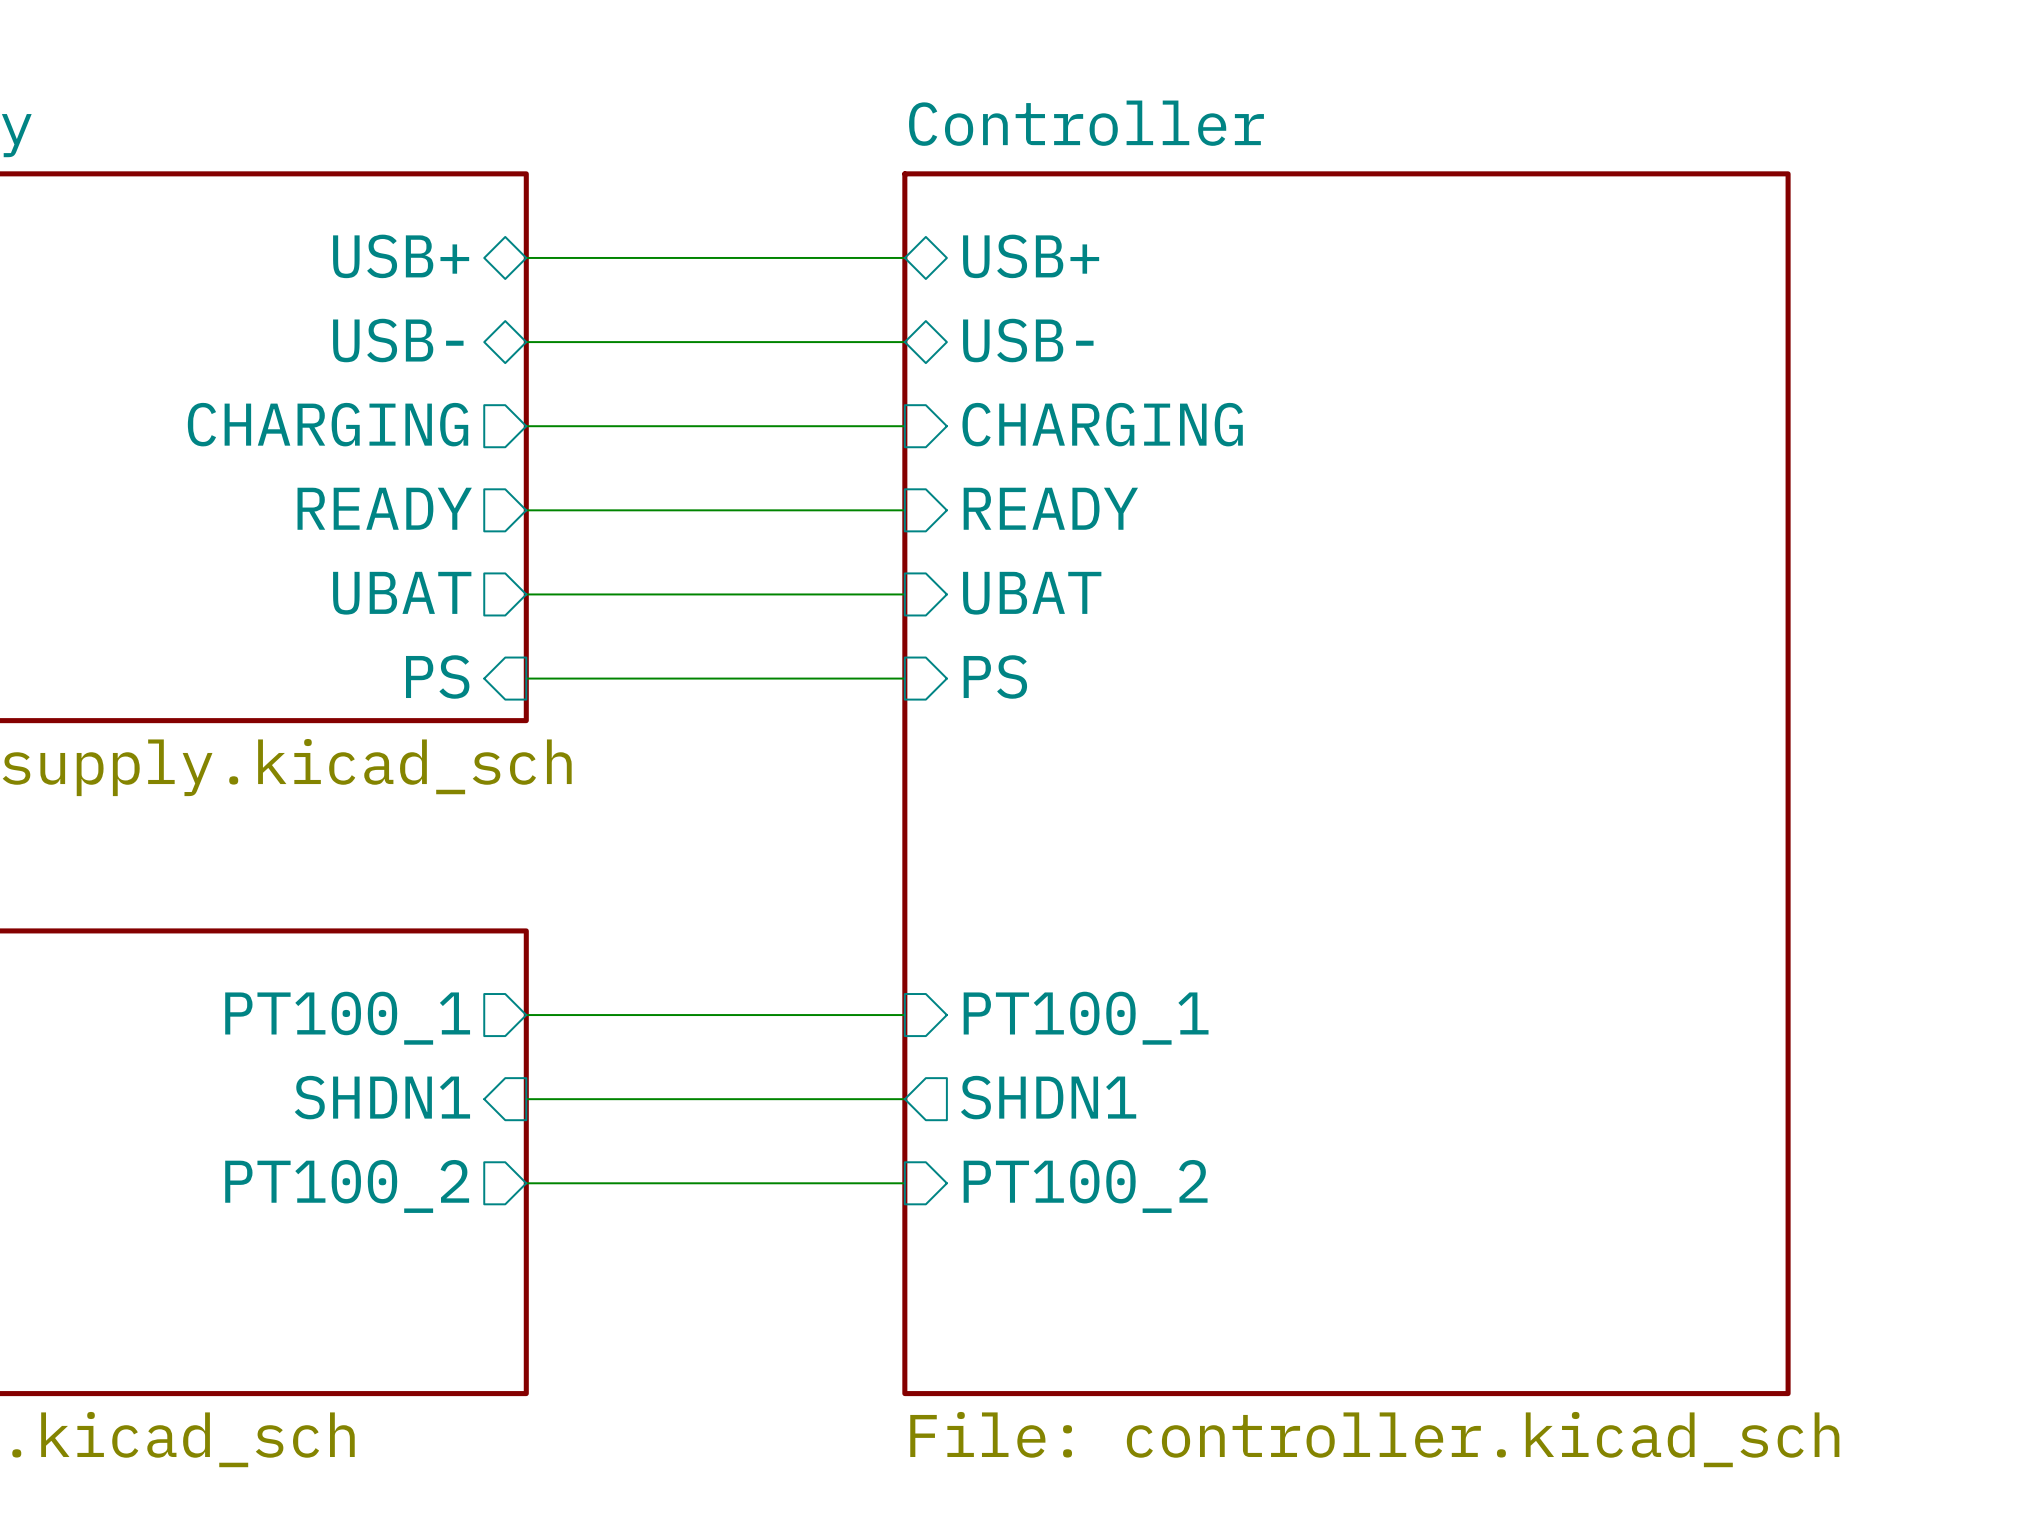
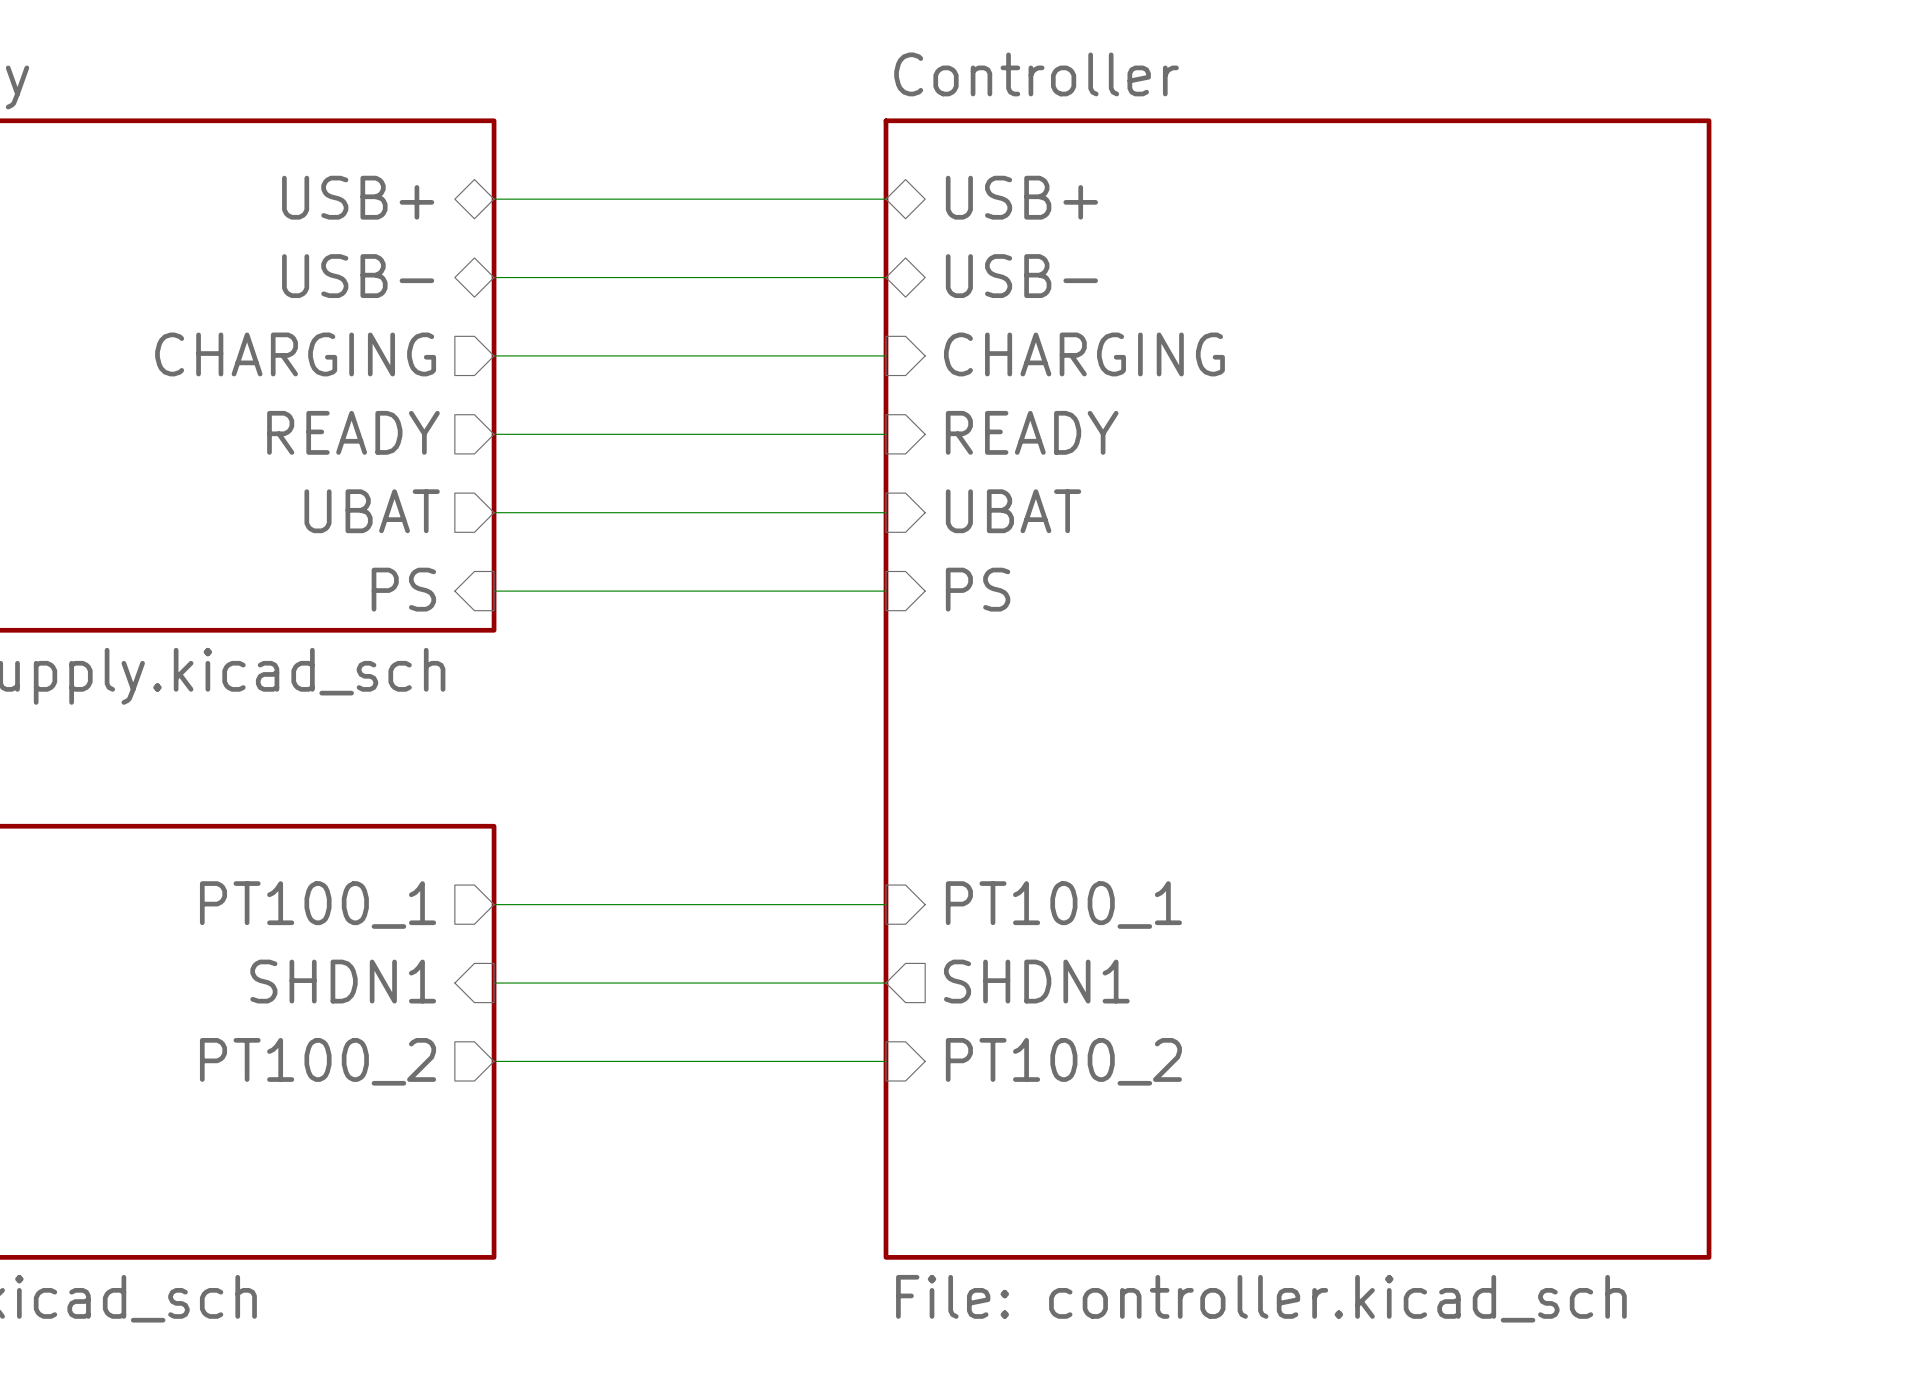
sheet pin position: USB+ (1031, 256) -> USB+ (1021, 197)
wire: none -> (846, 199) (885, 199)
sheet pin position: USB- (1028, 340) -> USB- (1021, 276)
wire: none -> (846, 277) (885, 277)
sheet pin position: CHARGING (1102, 424) -> CHARGING (1084, 354)
wire: none -> (846, 355) (885, 355)
sheet pin position: READY (1050, 508) -> READY (1032, 432)
wire: none -> (846, 434) (885, 434)
sheet pin position: UBAT (1032, 593) -> UBAT (1013, 511)
wire: none -> (846, 512) (885, 512)
sheet pin position: PS (995, 676) -> PS (978, 589)
wire: none -> (846, 591) (885, 591)
sheet Controller position: (1346, 783) -> (1297, 689)
wire: none -> (846, 904) (885, 904)
sheet pin position: PT100_1 (1086, 1018) -> PT100_1 (1063, 905)
sheet pin position: SHDN1 (1048, 1097) -> SHDN1 (1036, 981)
wire: none -> (846, 983) (885, 983)
wire: none -> (846, 1061) (885, 1061)
sheet pin position: PT100_2 (1085, 1186) -> PT100_2 (1063, 1061)

